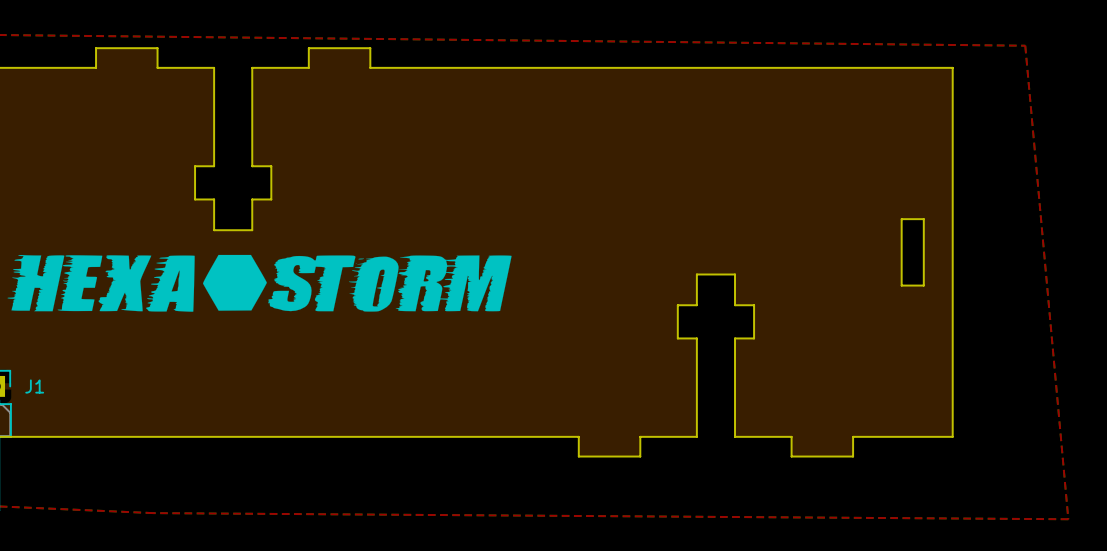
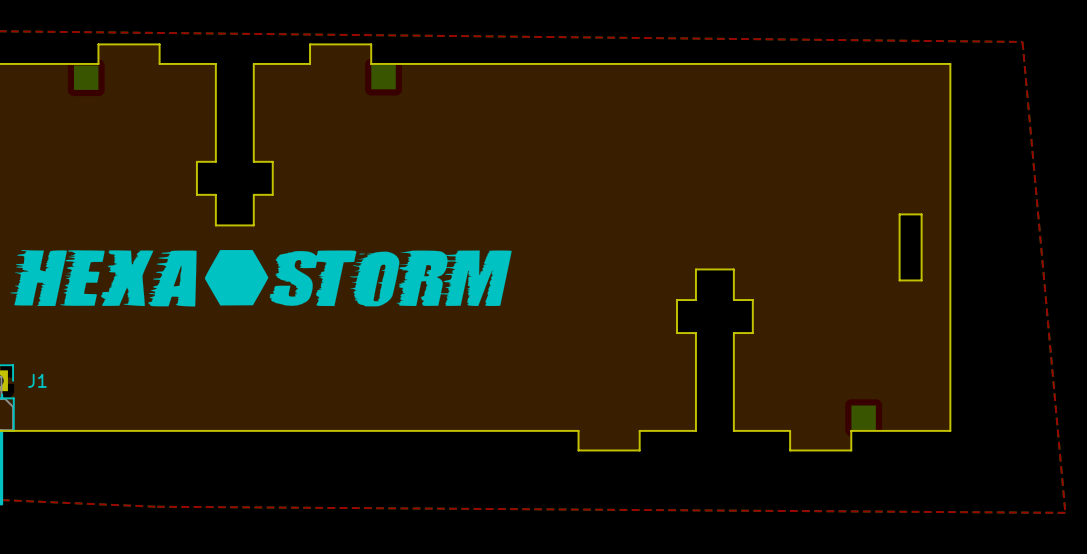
part: none -> (86, 77)
part: none -> (383, 77)
part: none -> (863, 417)

